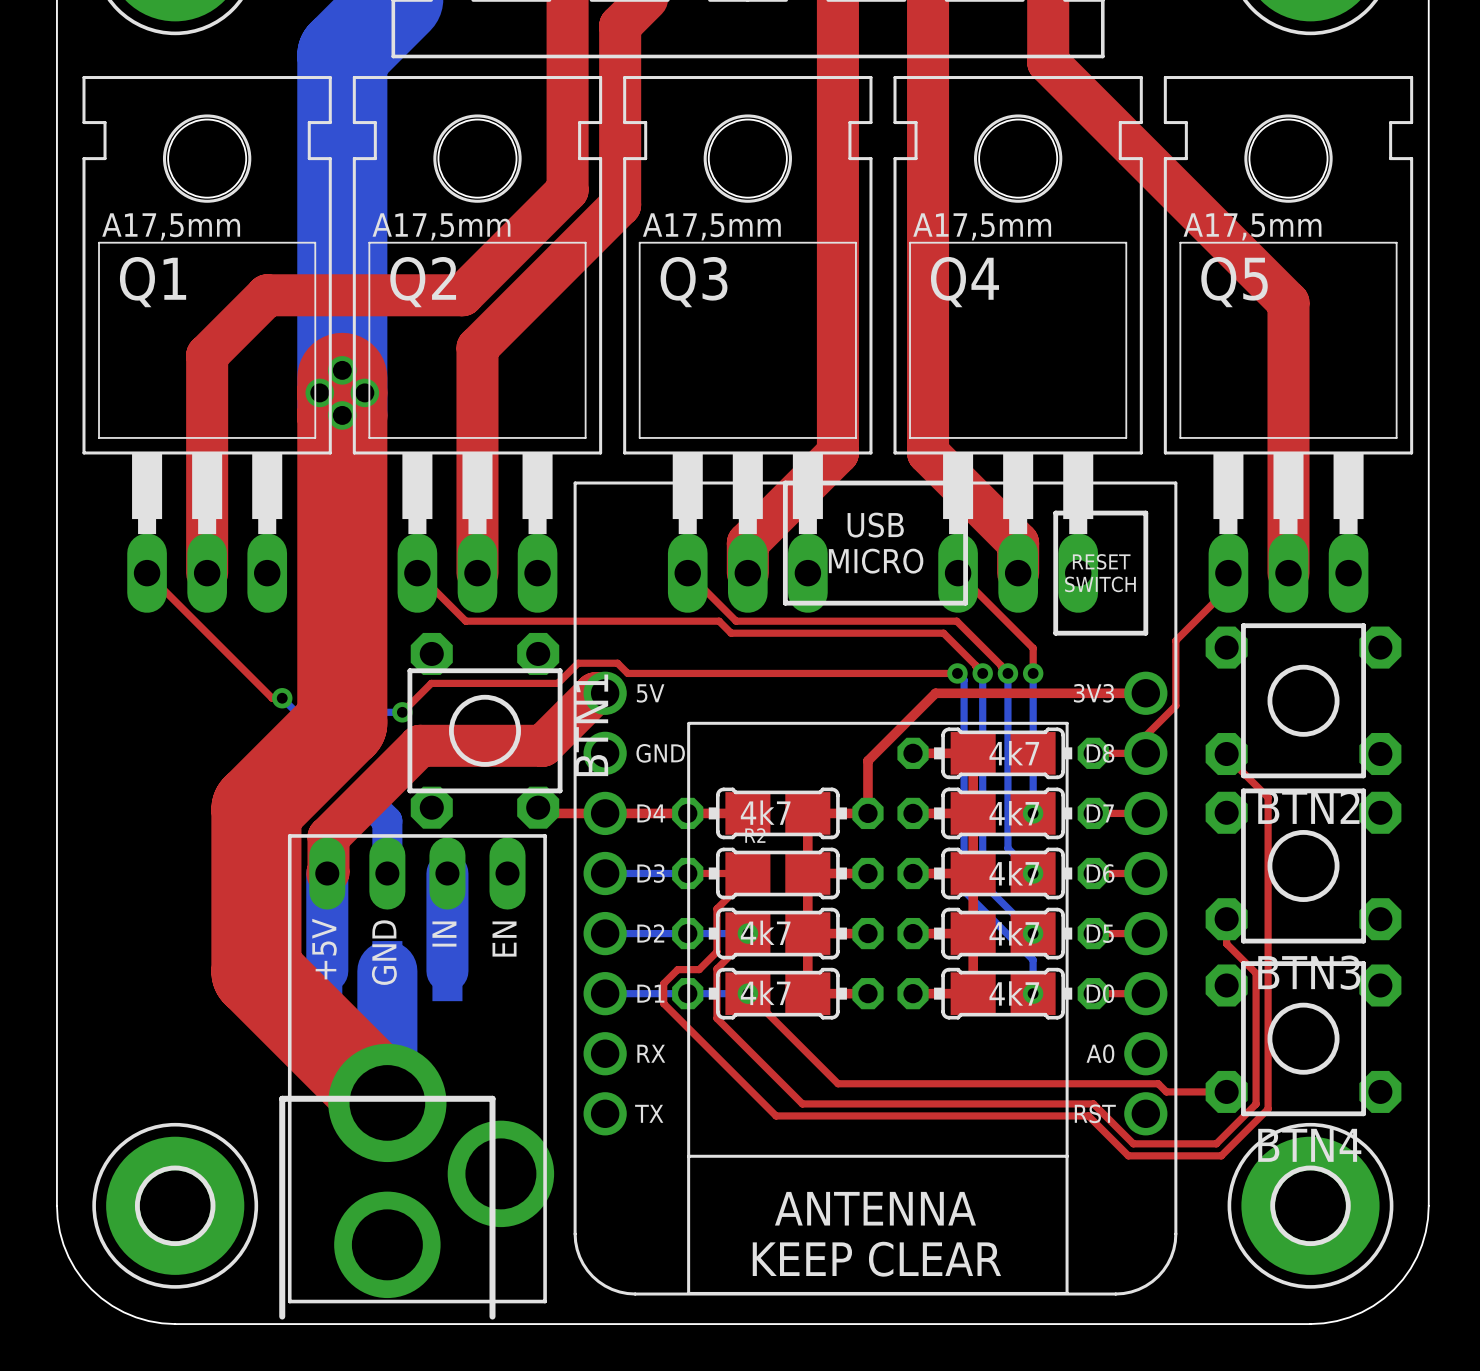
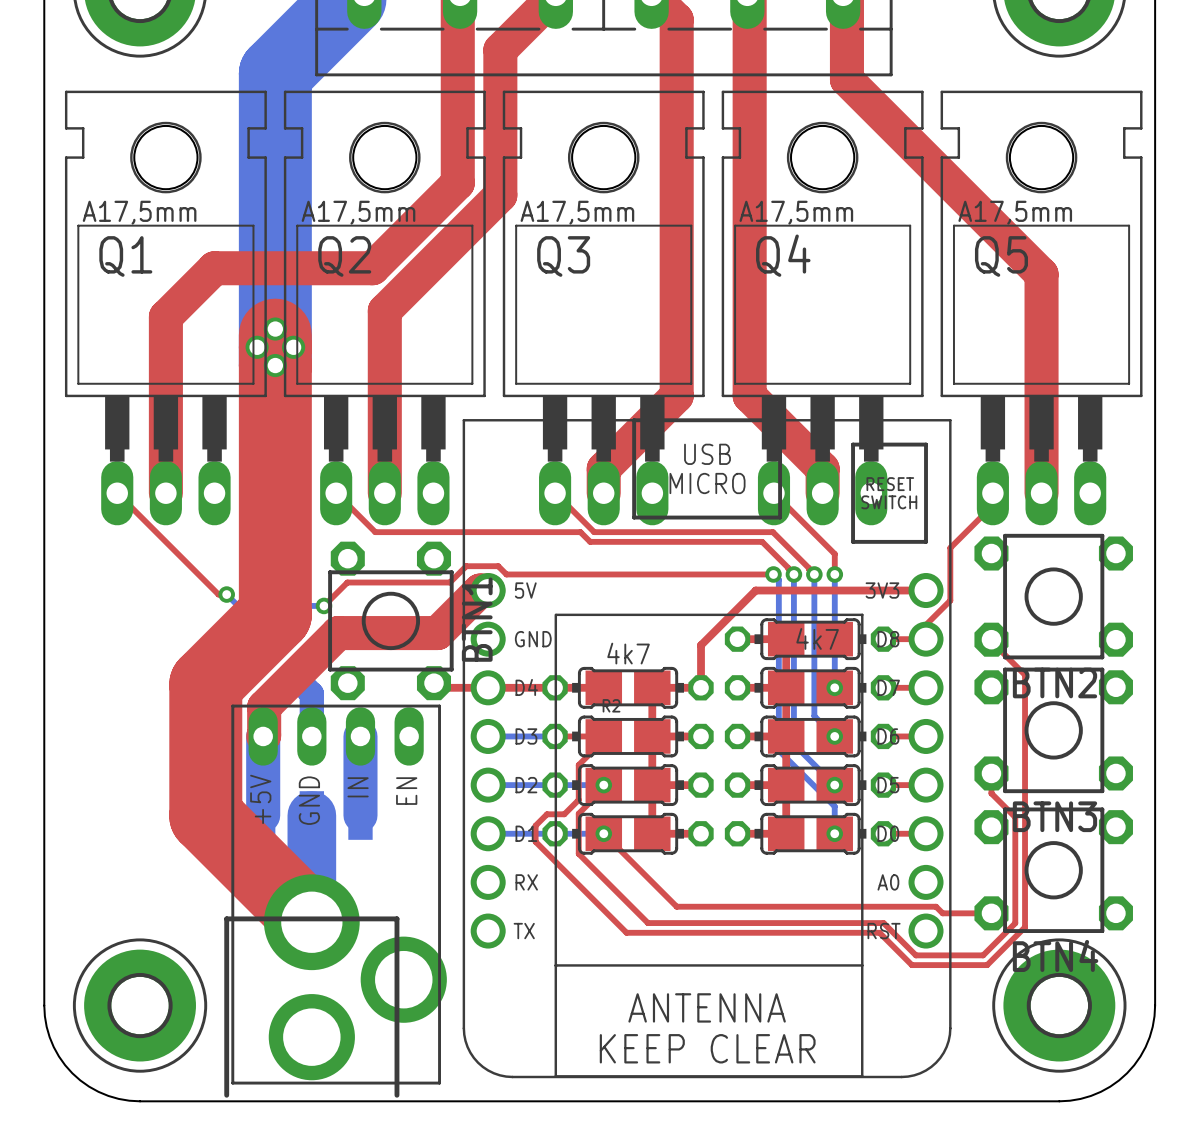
part value position: 4k7 (765, 812) -> 4k7 (628, 653)
part value: 4k7 (1014, 813) -> none
part value: 4k7 (1014, 873) -> none
part value: 4k7 (765, 932) -> none
part value: 4k7 (1014, 933) -> none
part value: 4k7 (765, 992) -> none
part value: 4k7 (1014, 993) -> none

